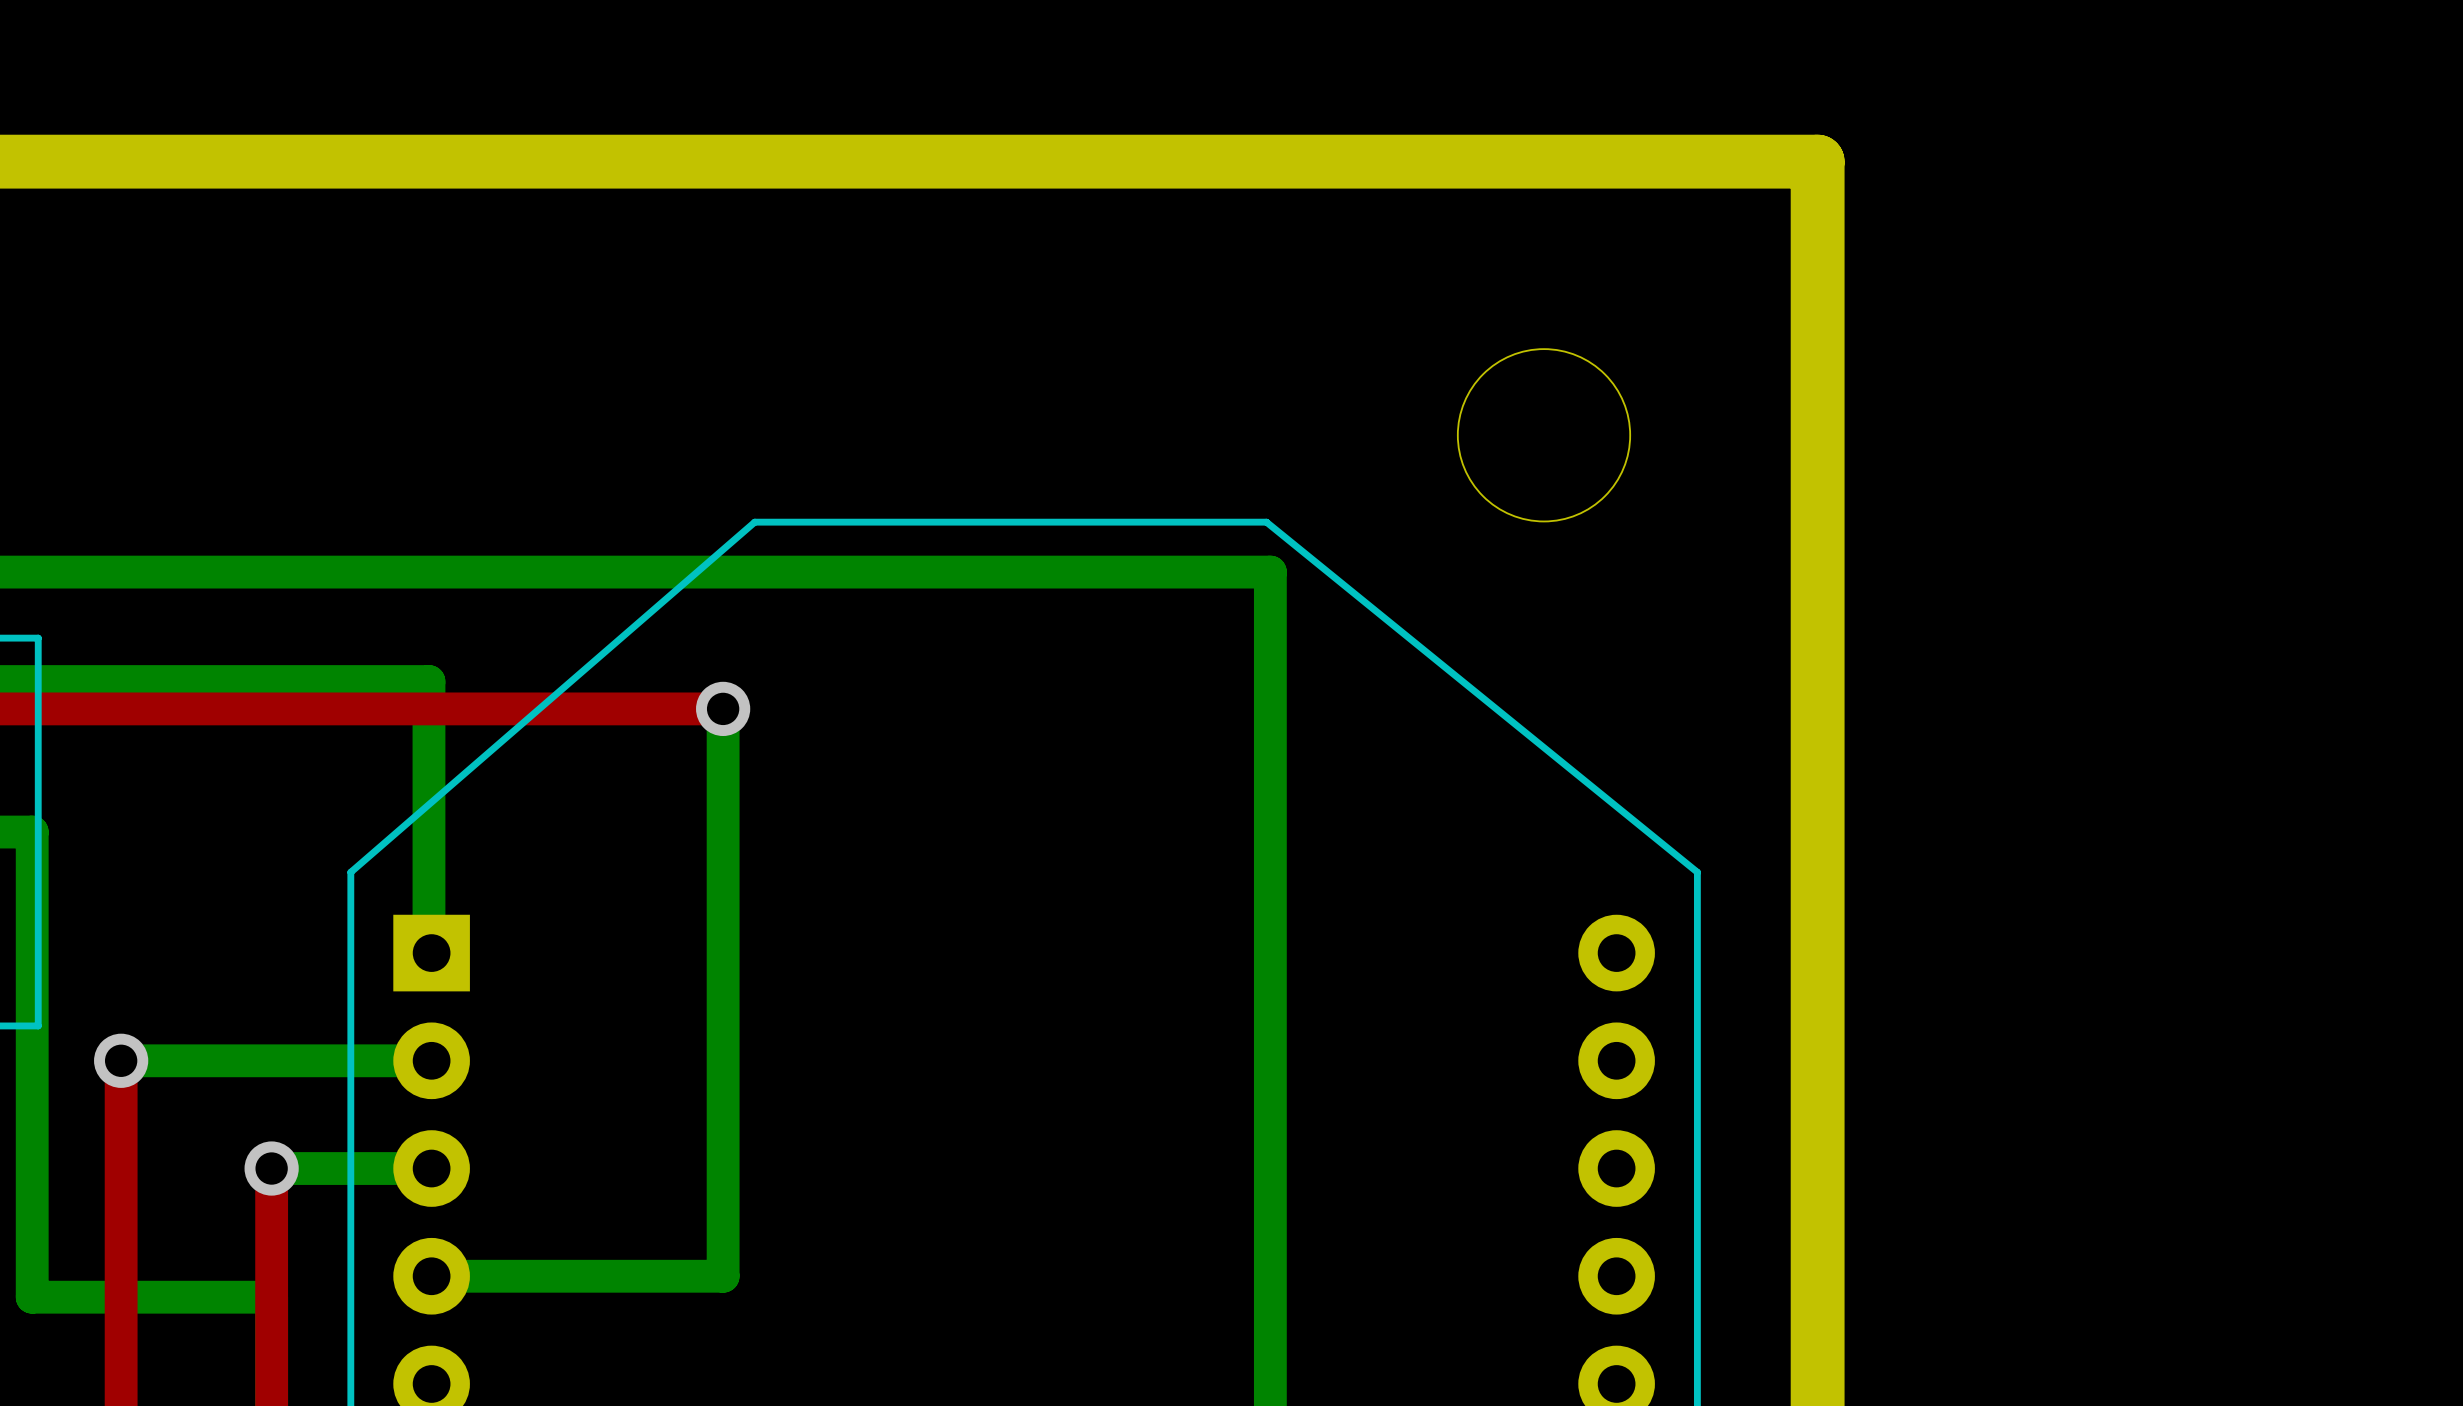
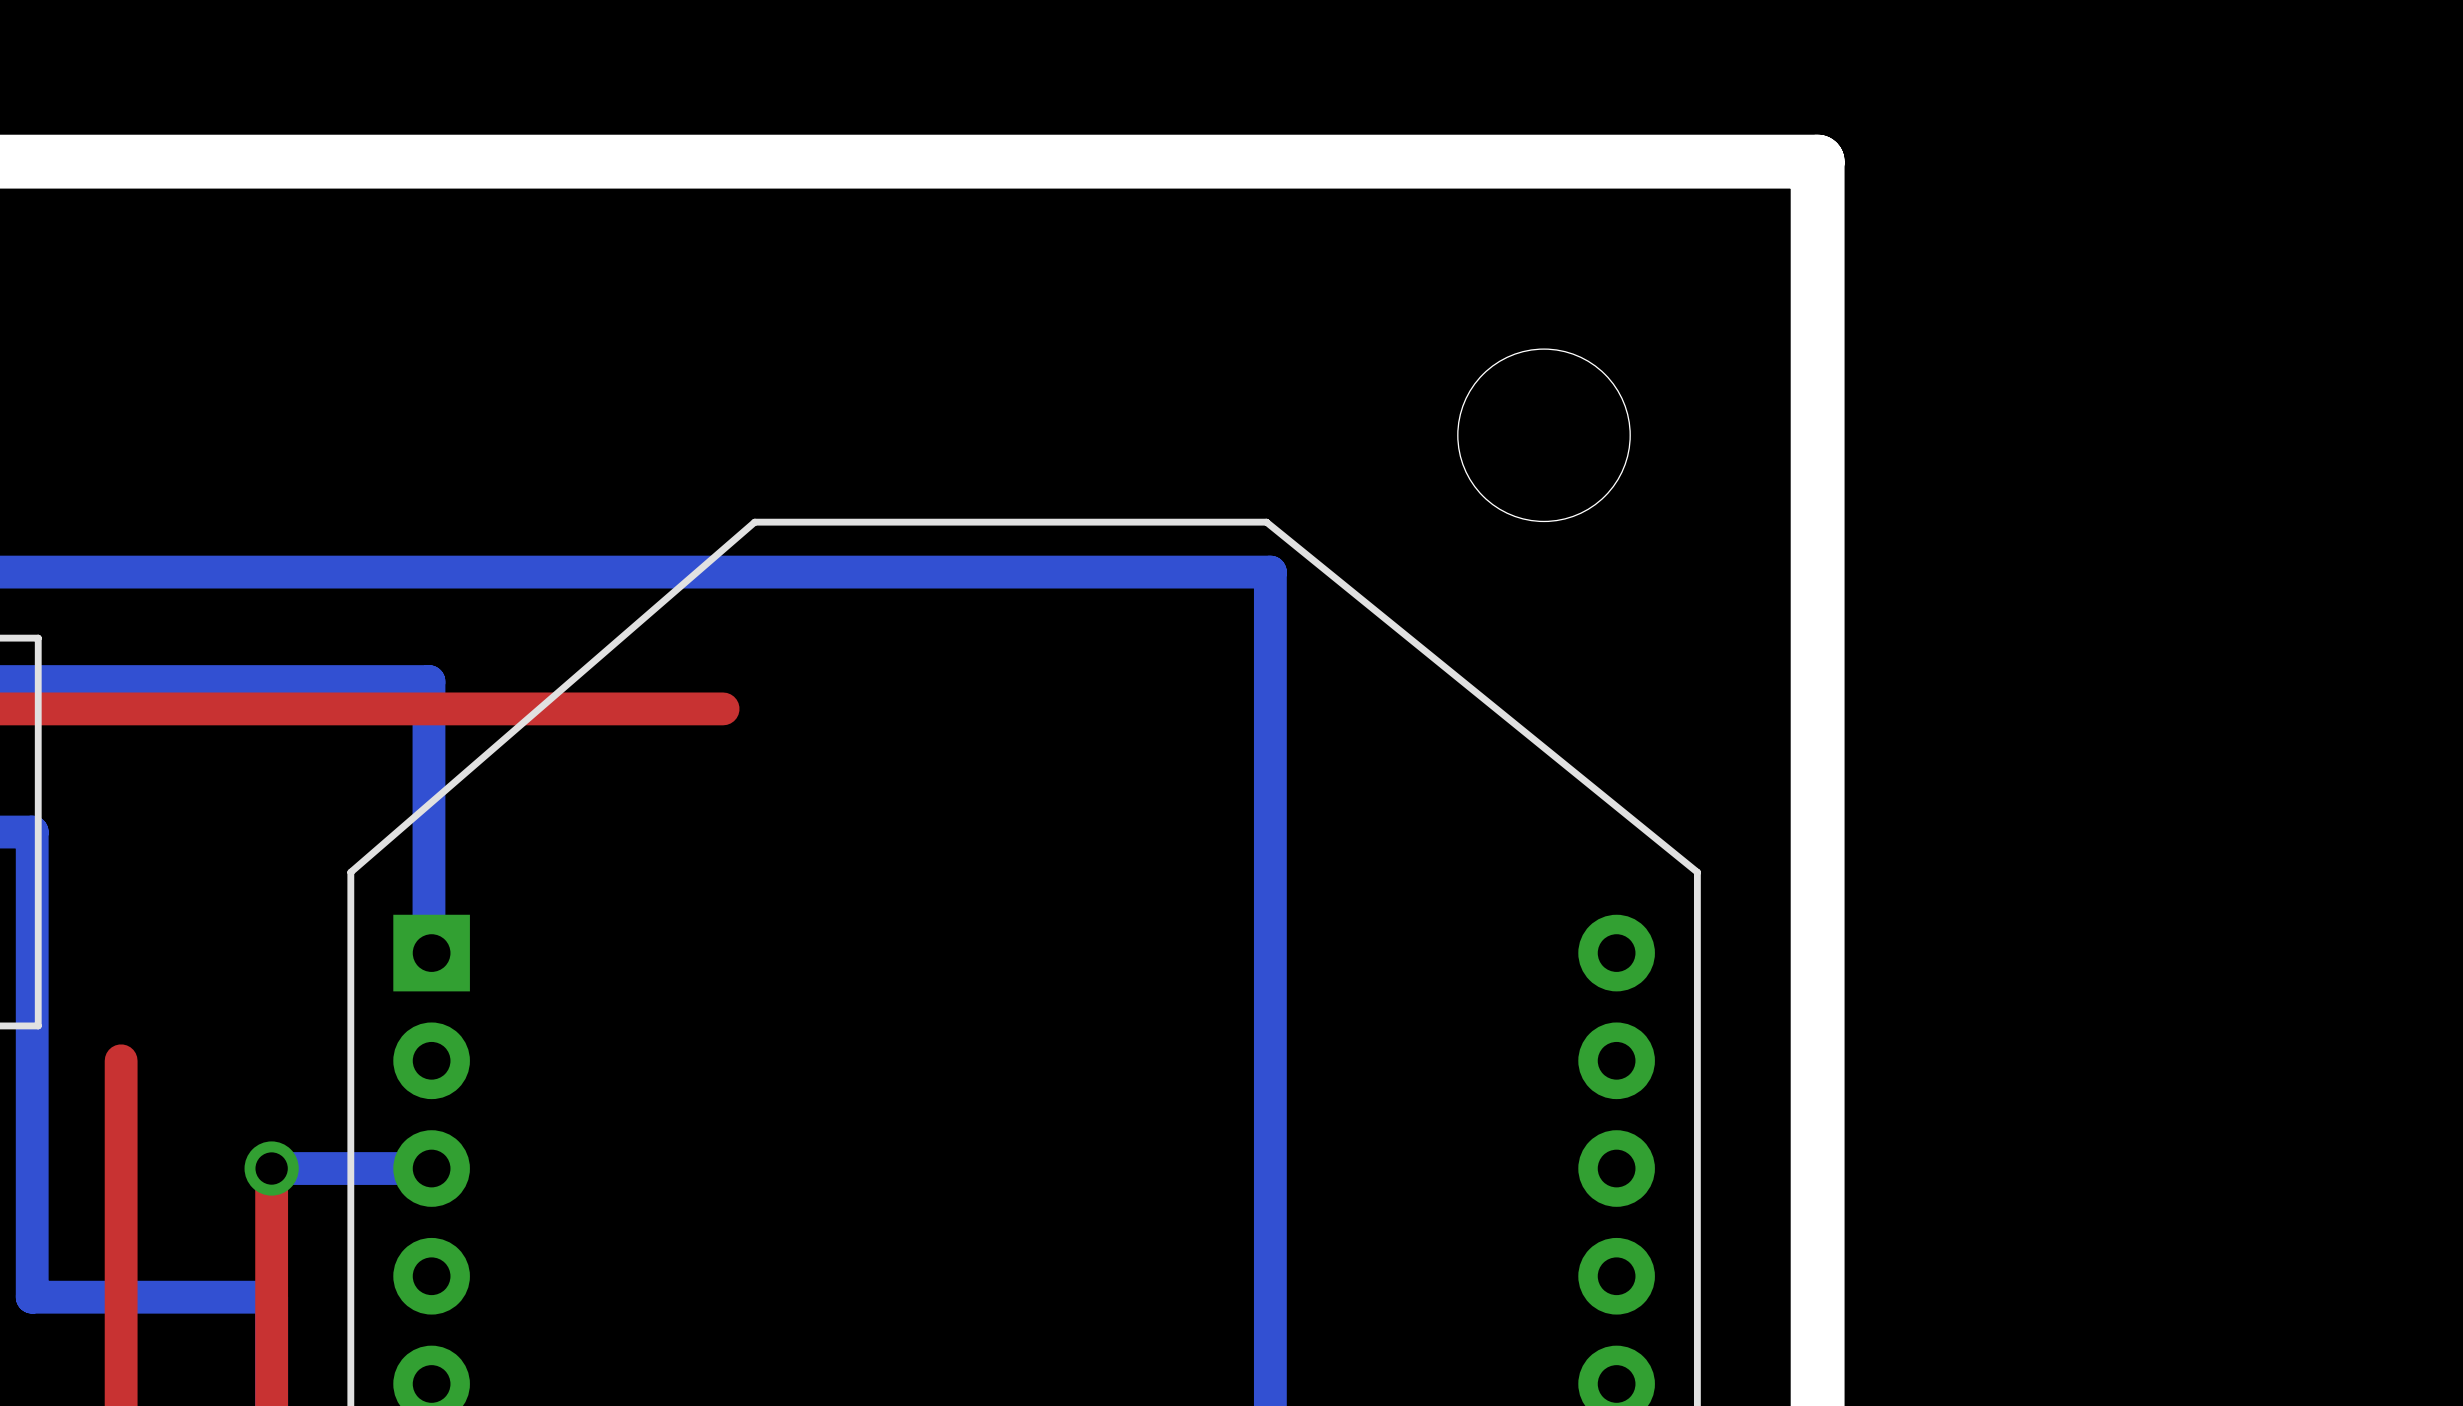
bottom track: (723, 708) (723, 1276) (431, 1276) -> none
via: (723, 708) -> none
bottom track: (121, 1060) (431, 1060) -> none
via: (121, 1060) -> none

